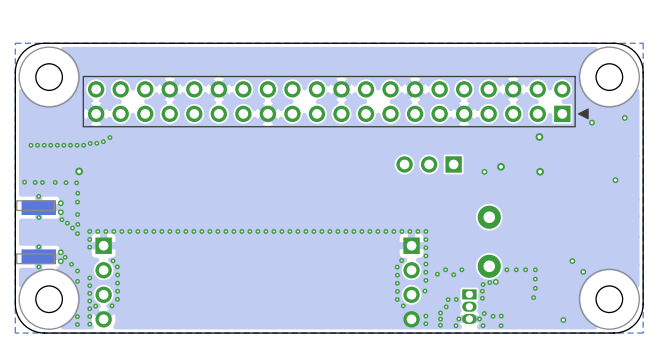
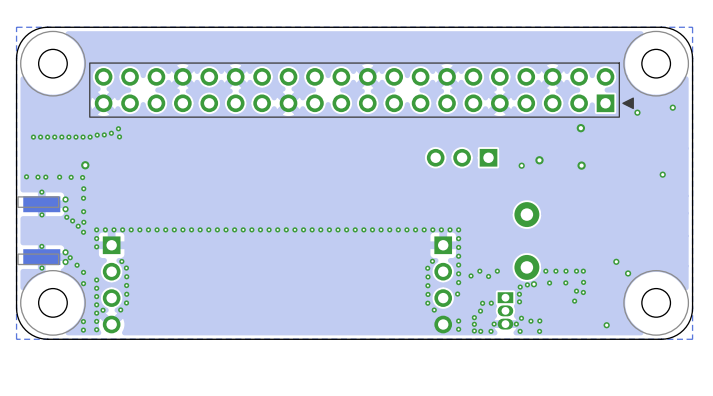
via: none -> (119, 136)
via: none -> (583, 271)
via: (535, 279) -> none
via: none -> (549, 283)
via: none -> (565, 282)
via: none -> (583, 282)
via: none -> (583, 292)
via: none -> (480, 331)

